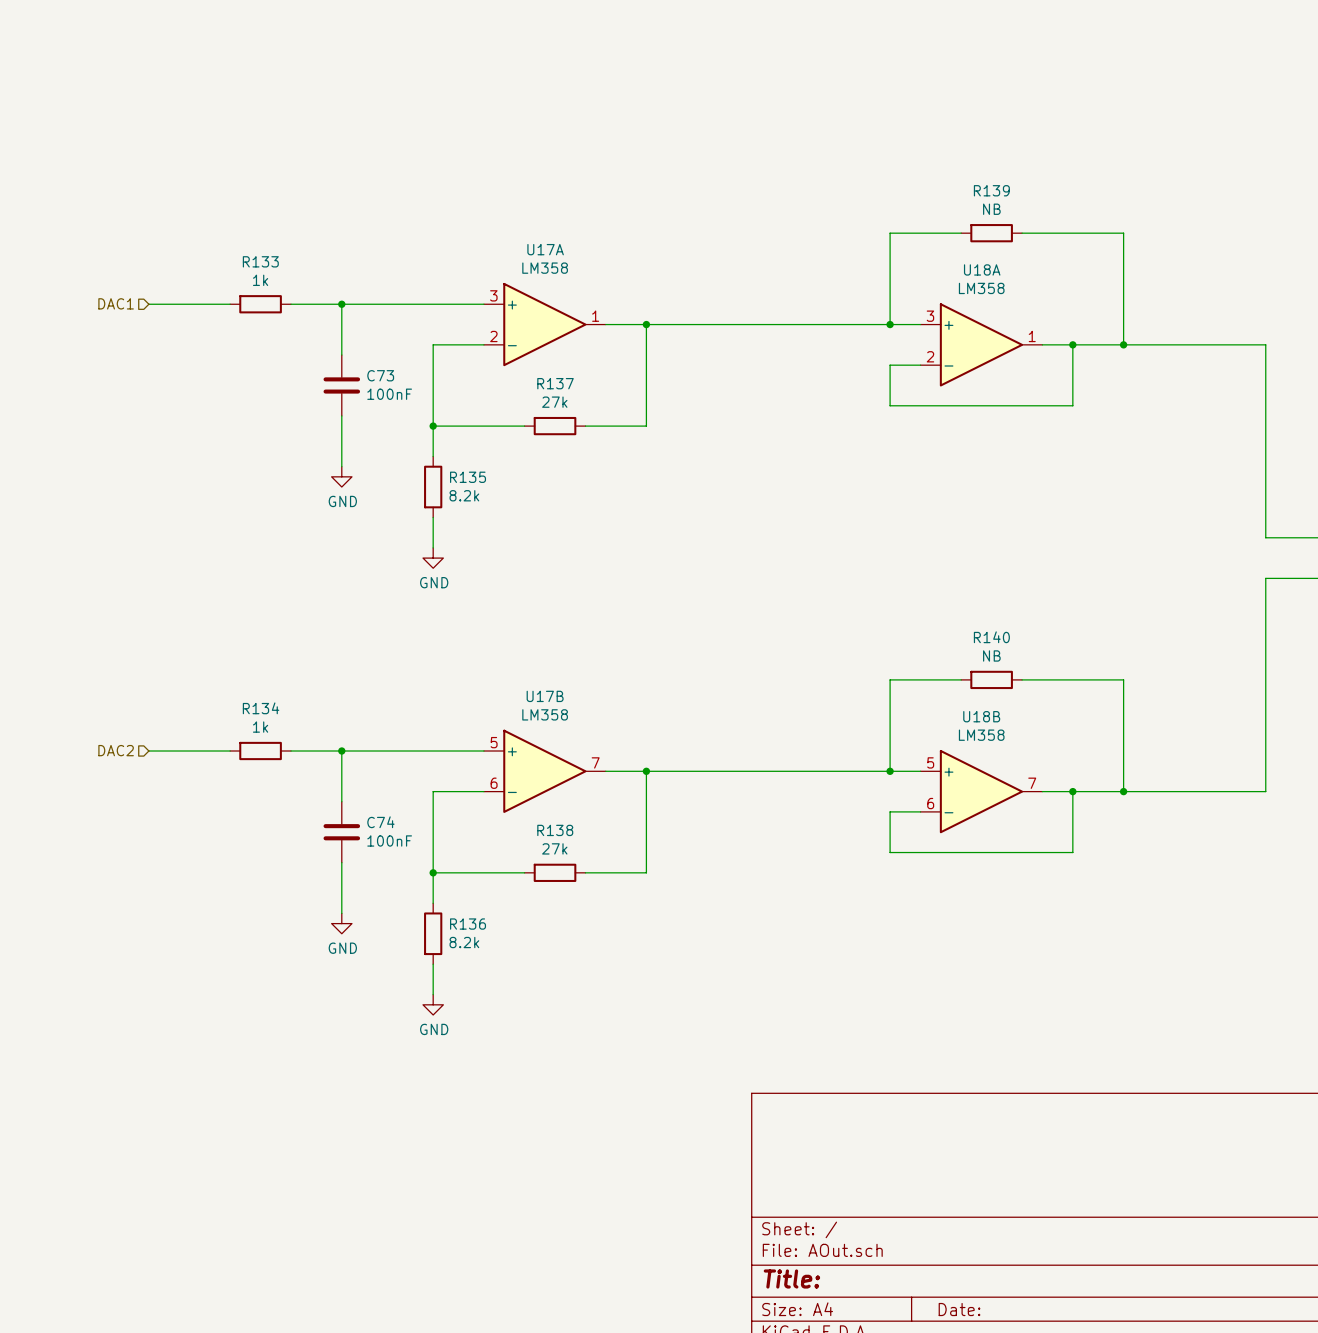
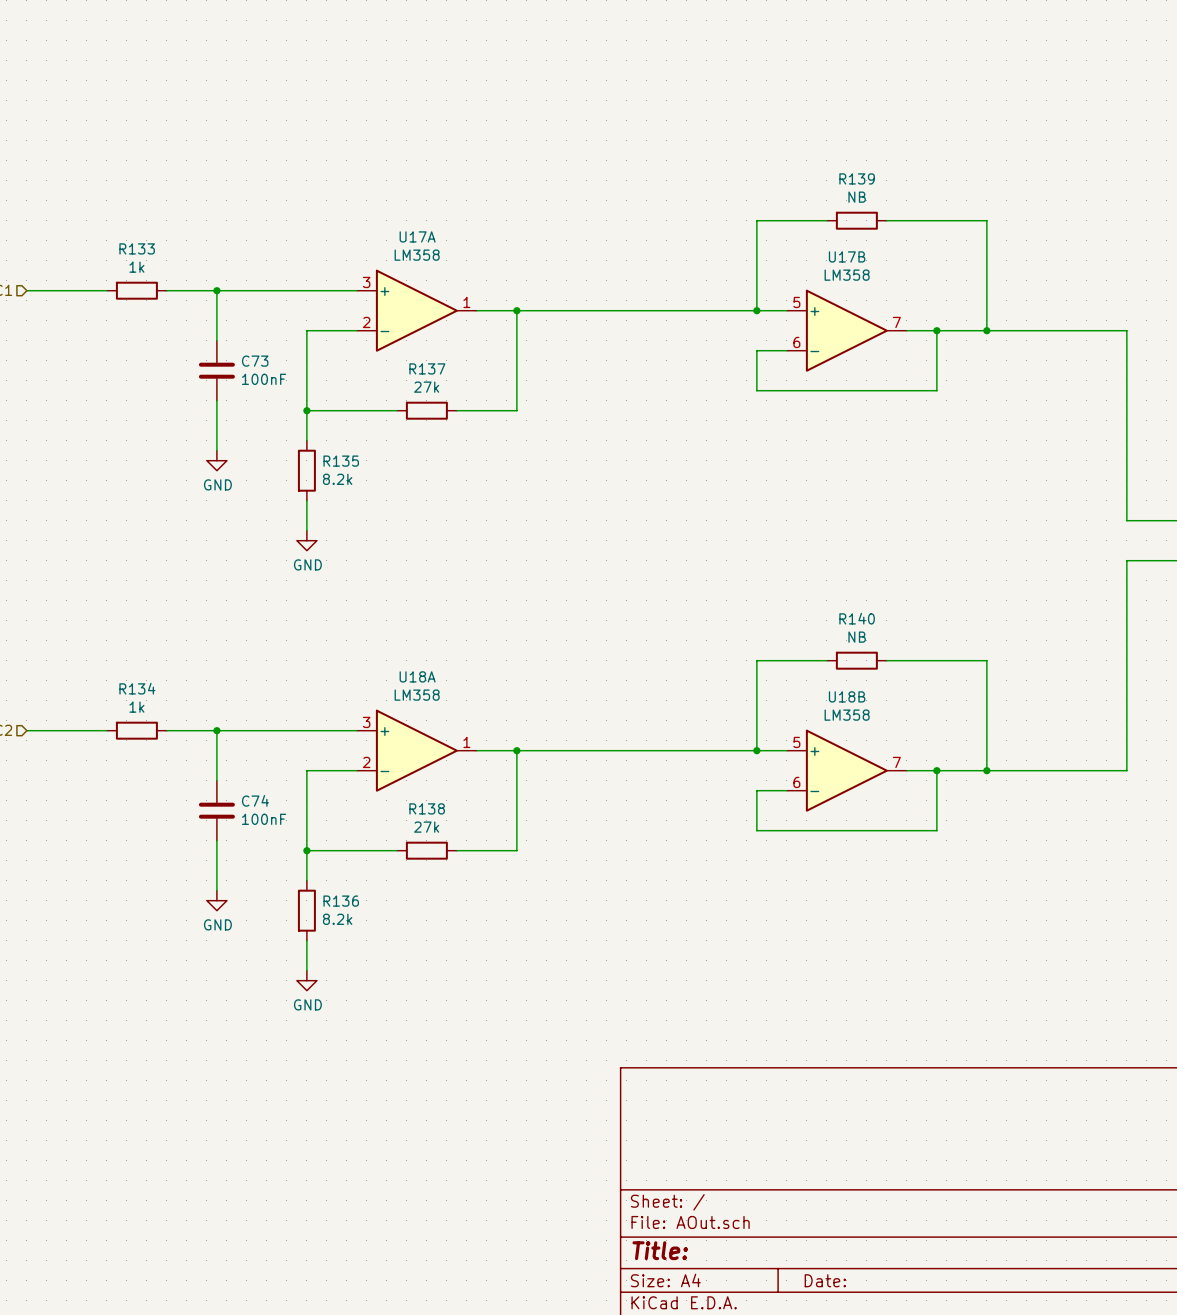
U18A position: (981, 344) -> (416, 750)
U17B position: (544, 771) -> (846, 330)

